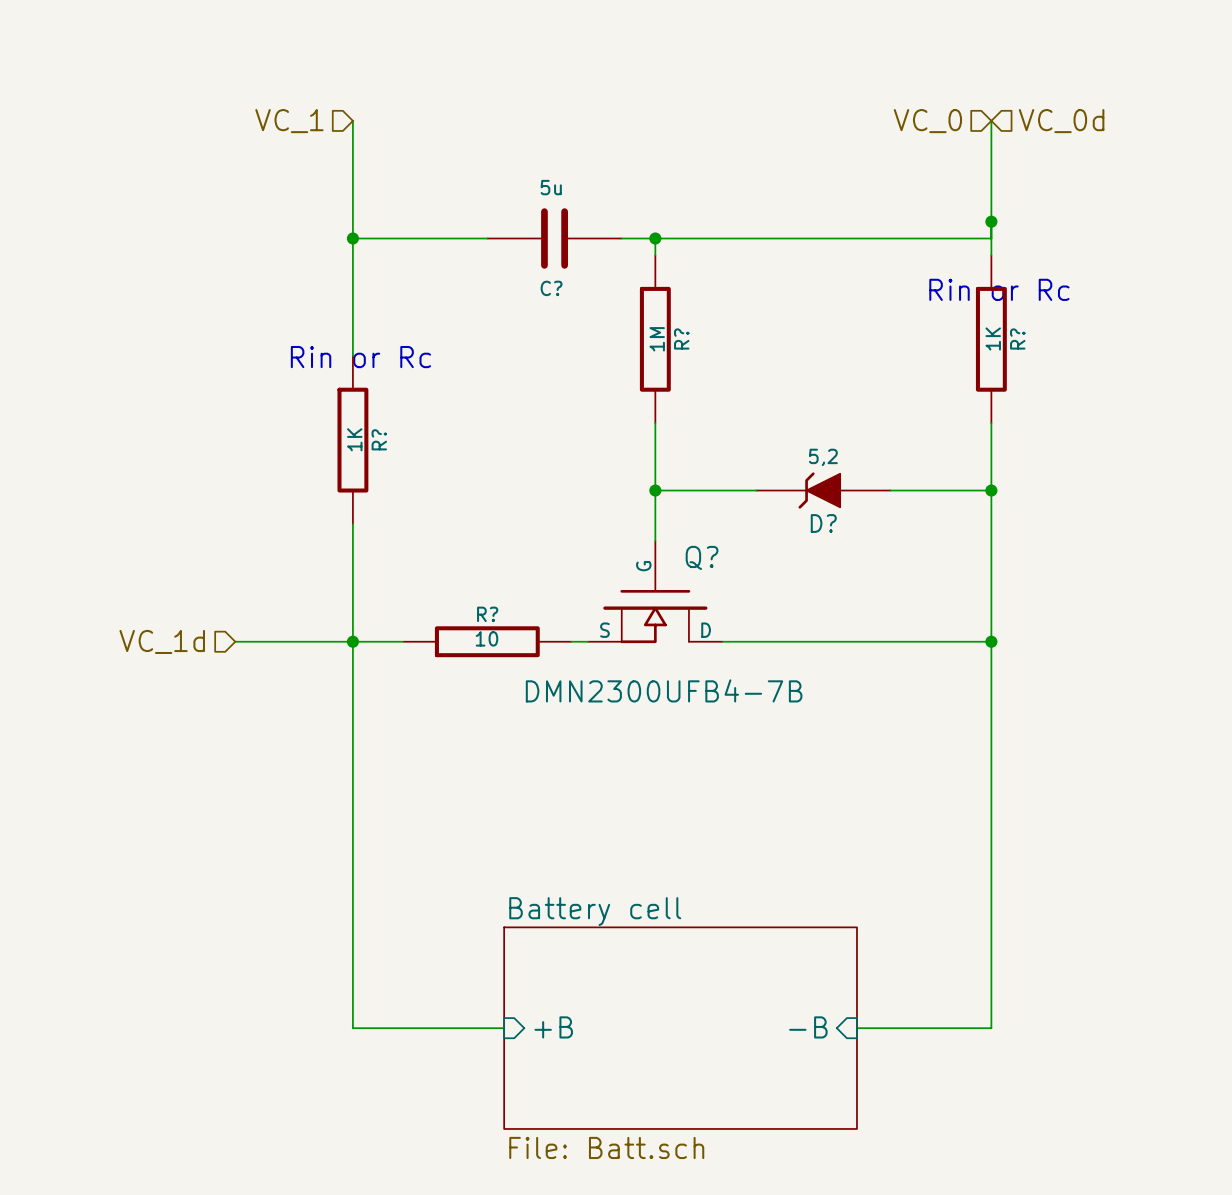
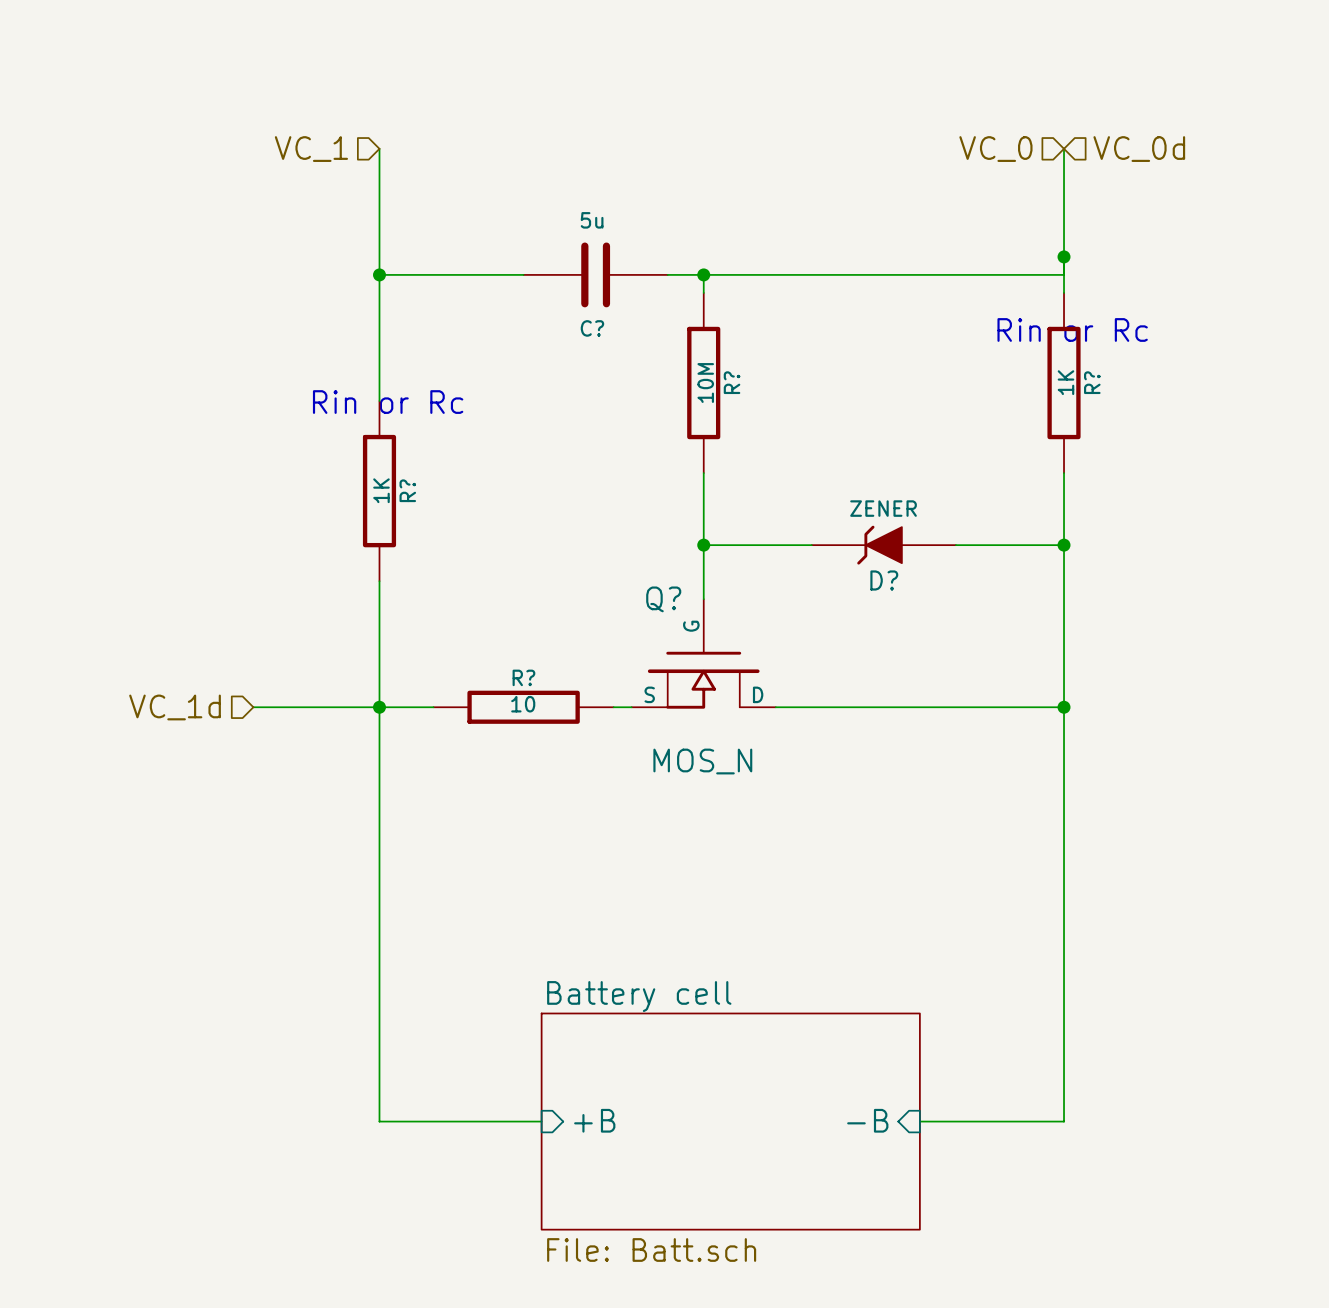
R? value: 1M (657, 339) -> 10M (705, 382)
D? value: 5,2 (823, 457) -> ZENER (883, 508)
Q? name position: Q? (702, 557) -> Q? (663, 599)
Q? value: DMN2300UFB4-7B (664, 690) -> MOS_N (702, 761)

